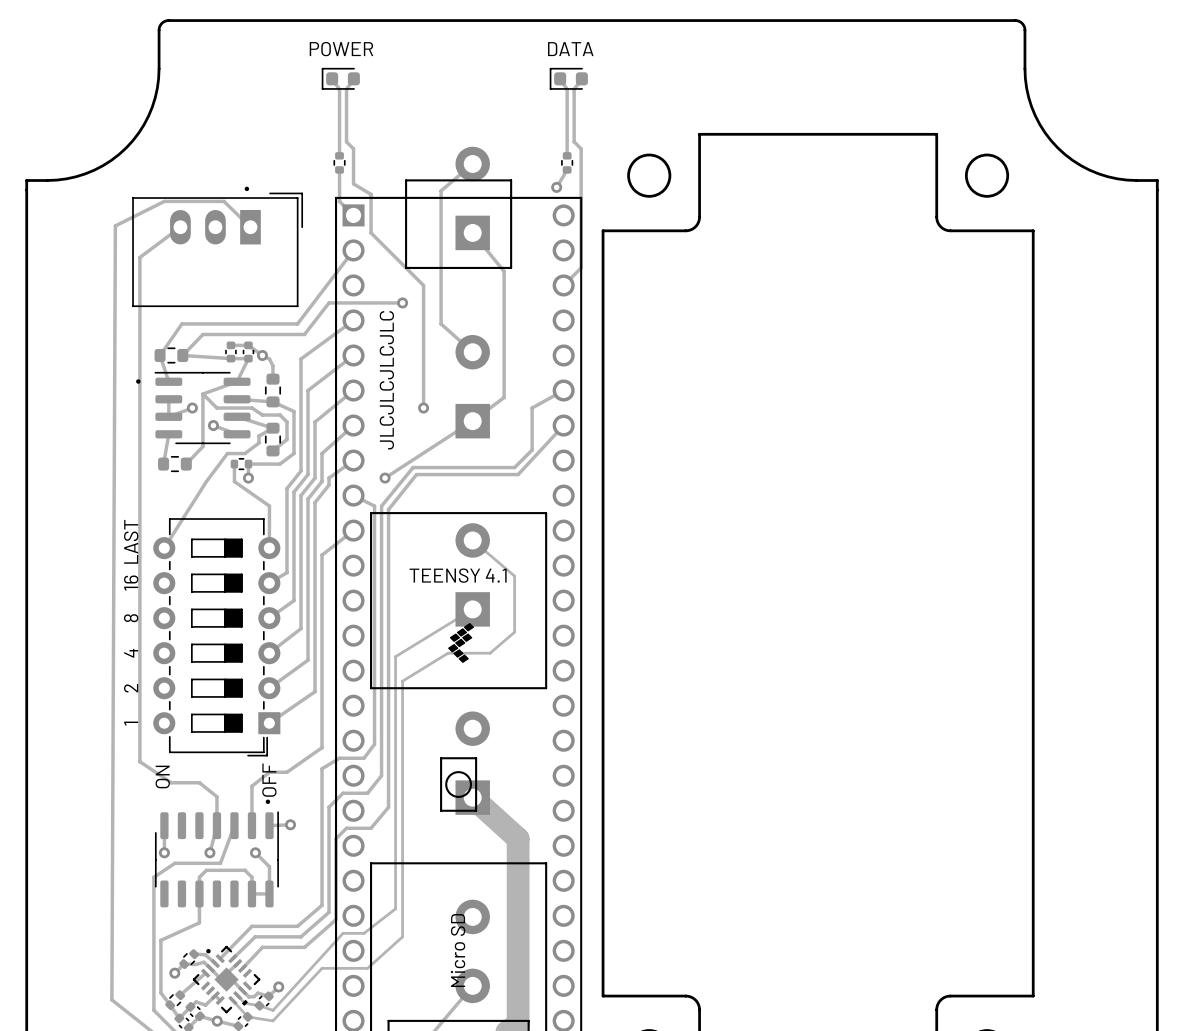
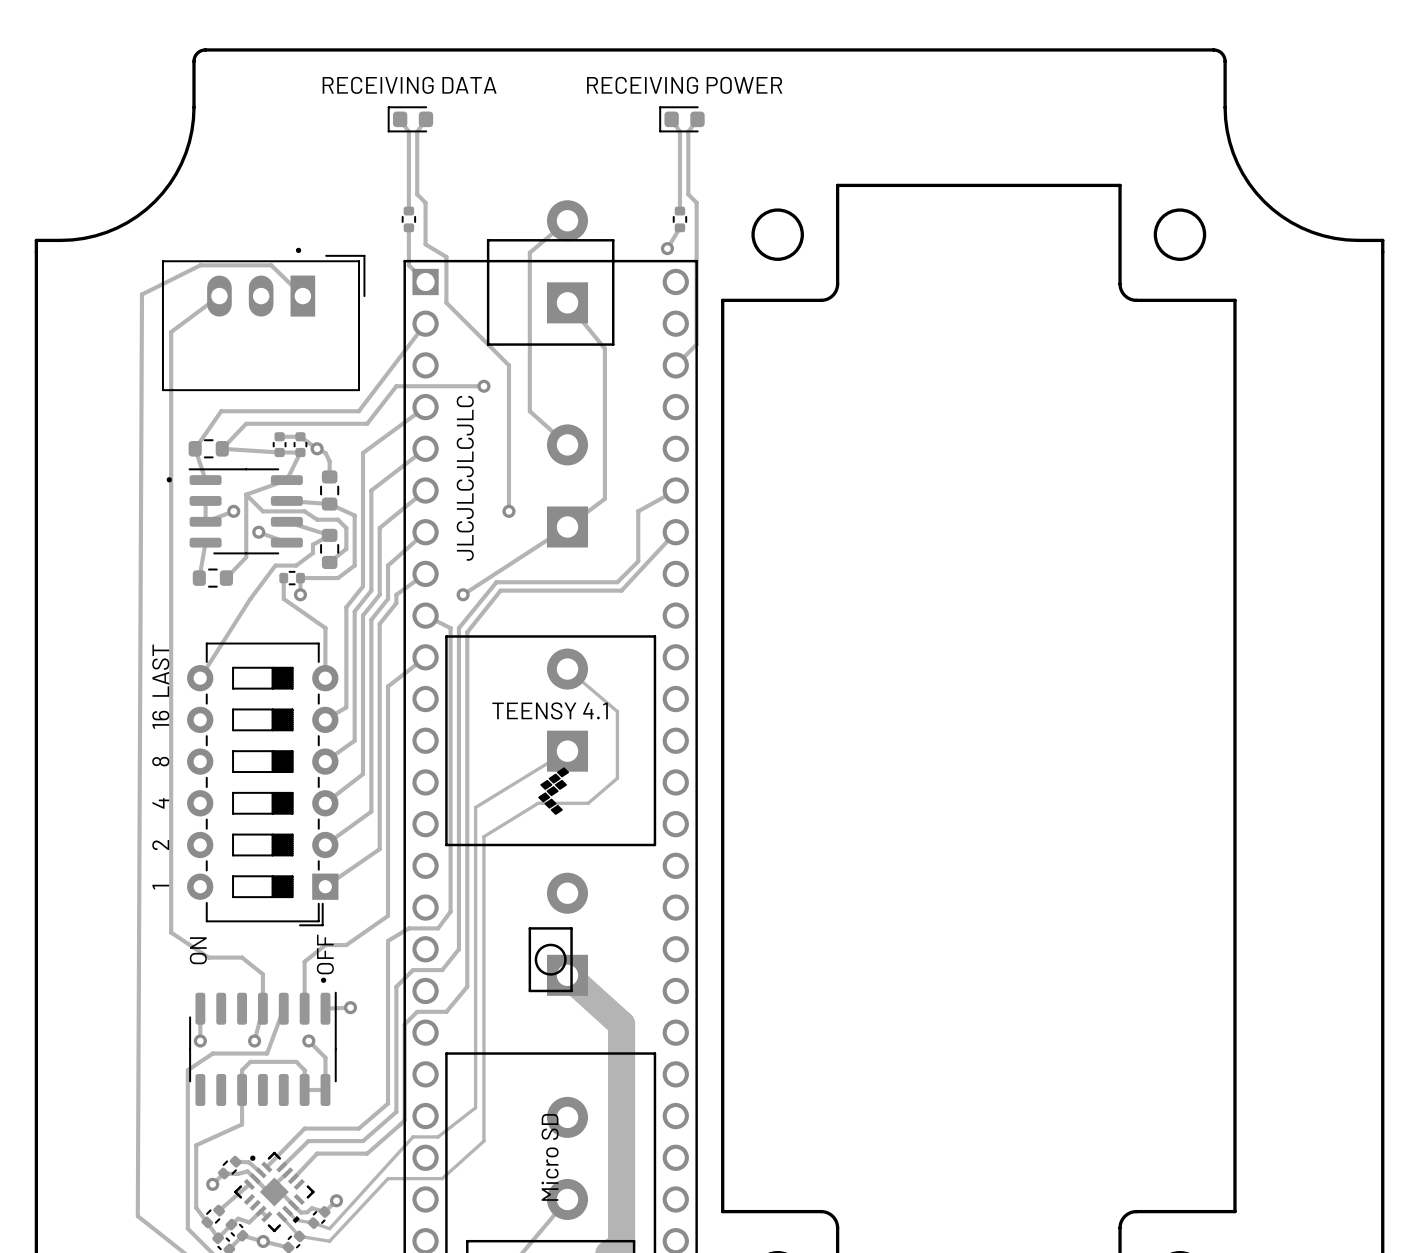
text: POWER (341, 49) -> none
text: DATA (570, 49) -> none
RECEIVING DATA name: none -> RECEIVING DATA (409, 85)
RECEIVING POWER name: none -> RECEIVING POWER (684, 85)

